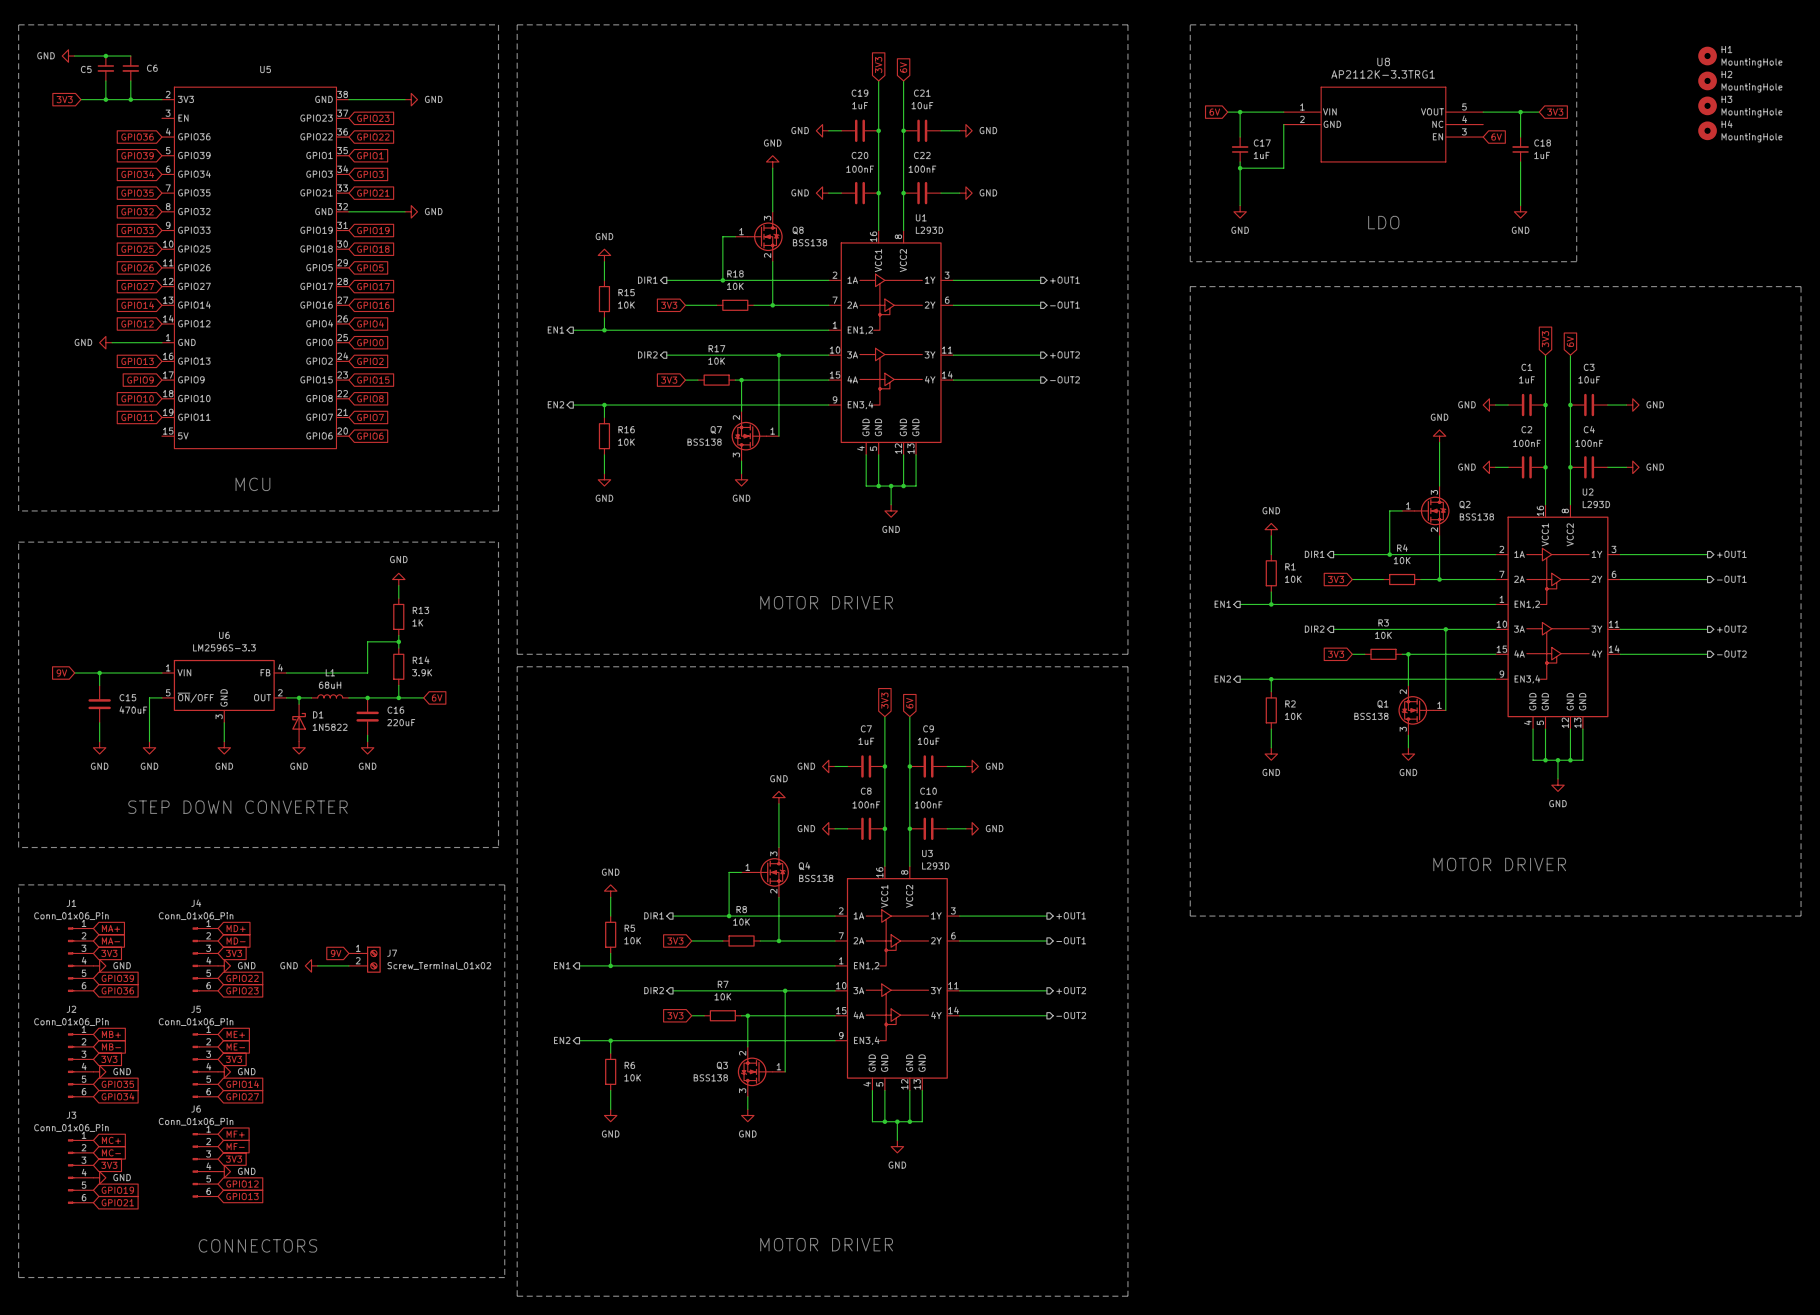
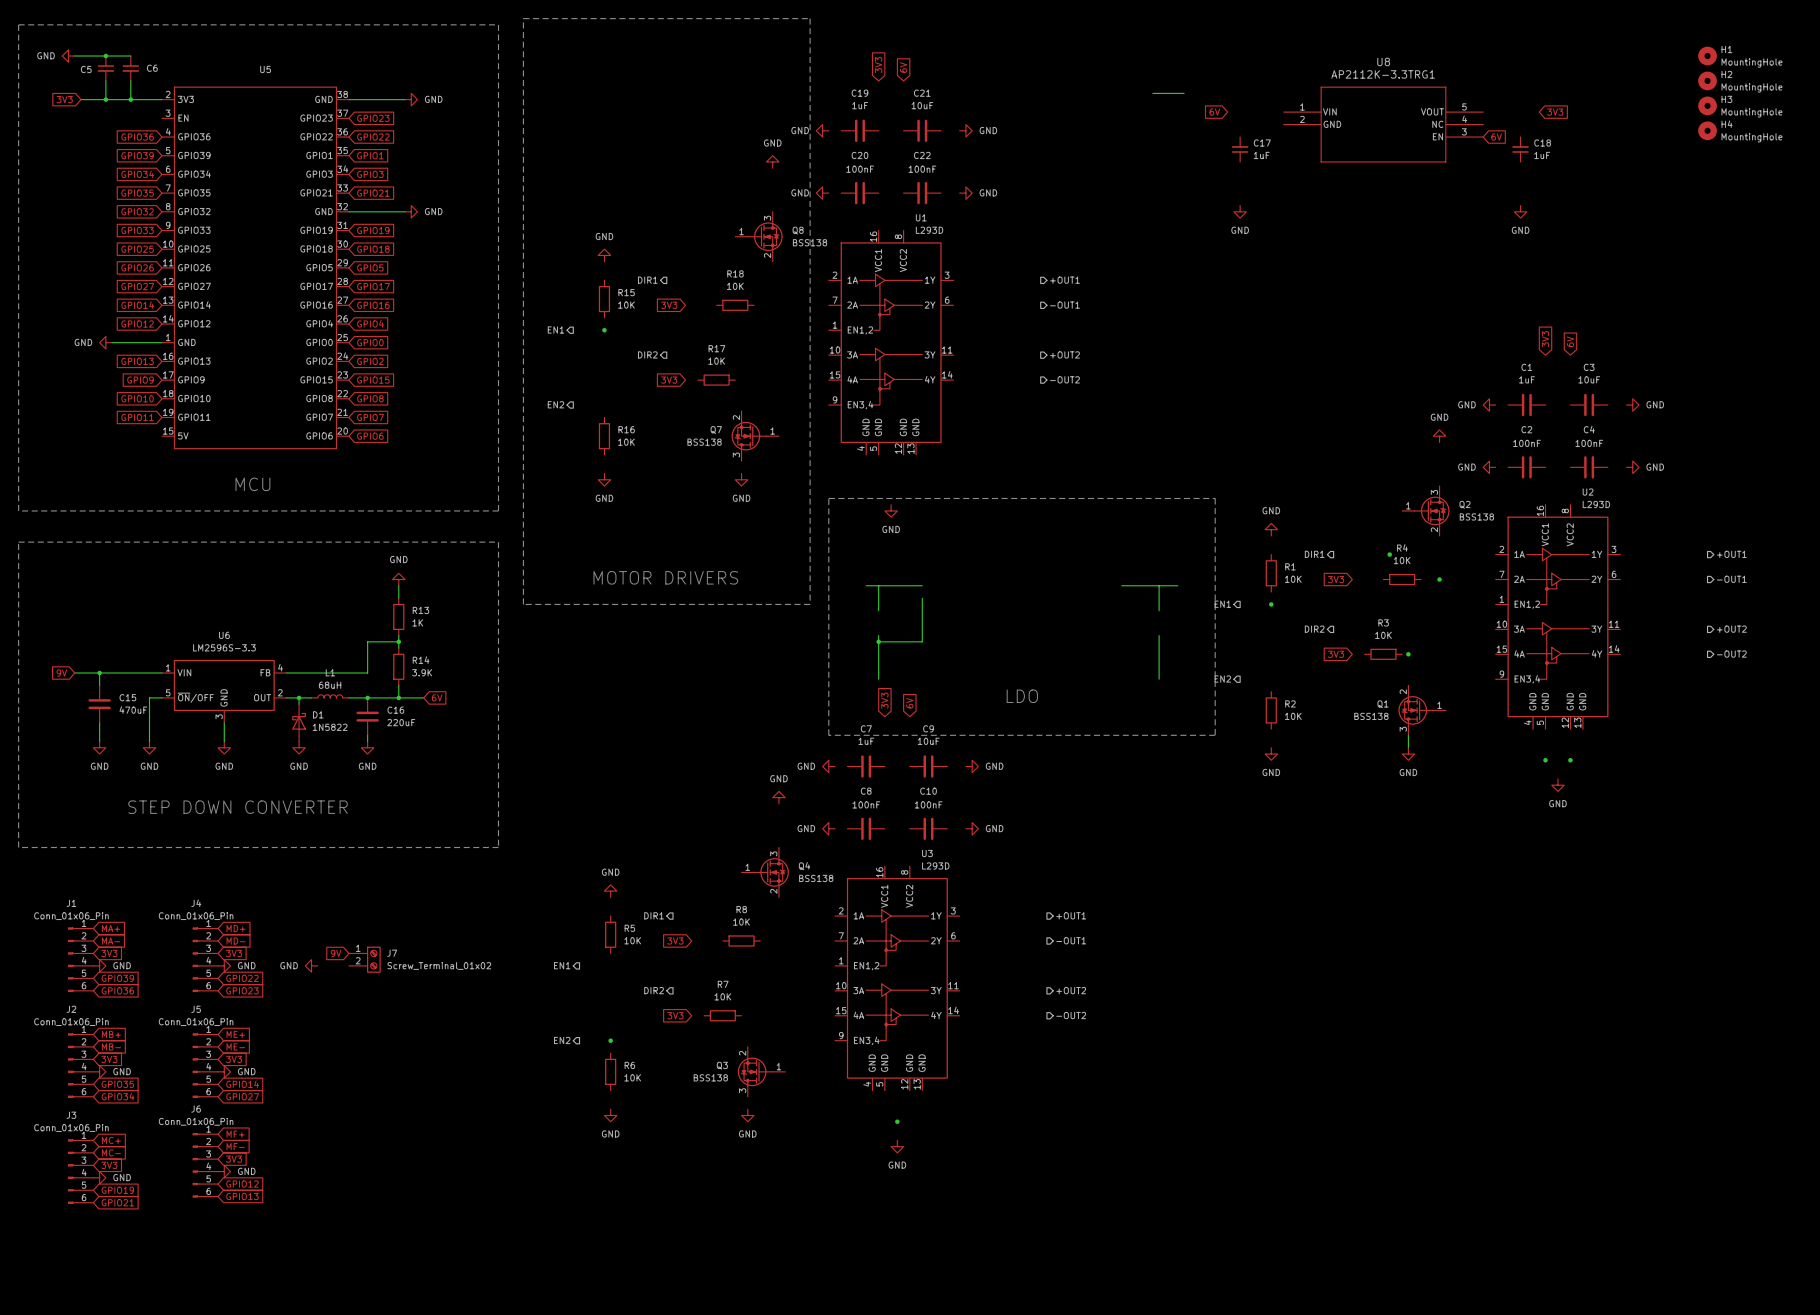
line: none -> (523, 18) (810, 18) (810, 604) (523, 604) (523, 18)
line: (517, 24) (517, 654) (1127, 654) (1127, 24) (517, 24) -> none
line: (1190, 24) (1576, 24) (1576, 261) (1190, 261) (1190, 24) -> none
wire: (878, 80) (878, 230) -> none
wire: (903, 80) (903, 230) -> none
wire: none -> (1152, 93) (1184, 93)
wire: (1227, 112) (1283, 112) -> none
wire: (1240, 112) (1240, 137) -> none
junction: (1240, 112) -> none
wire: (1483, 112) (1539, 112) -> none
wire: (1520, 112) (1520, 137) -> none
junction: (1520, 112) -> none
wire: (1283, 124) (1283, 168) (1240, 168) -> none
wire: (828, 130) (841, 130) -> none
junction: (878, 130) -> none
junction: (903, 130) -> none
wire: (940, 130) (959, 130) -> none
wire: (1240, 161) (1240, 205) -> none
wire: (1520, 161) (1520, 205) -> none
wire: (772, 168) (772, 211) -> none
junction: (1240, 168) -> none
wire: (828, 193) (841, 193) -> none
junction: (878, 193) -> none
junction: (903, 193) -> none
wire: (940, 193) (959, 193) -> none
text: LDO (1383, 222) -> none
wire: (735, 236) (722, 236) (722, 280) -> none
wire: (604, 261) (604, 280) -> none
wire: (772, 261) (772, 305) -> none
wire: (666, 280) (828, 280) -> none
junction: (722, 280) -> none
wire: (953, 280) (1040, 280) -> none
line: (1190, 286) (1190, 916) (1801, 916) (1801, 286) (1190, 286) -> none
wire: (685, 305) (716, 305) -> none
wire: (754, 305) (828, 305) -> none
junction: (772, 305) -> none
wire: (953, 305) (1040, 305) -> none
wire: (604, 317) (604, 330) -> none
wire: (573, 330) (828, 330) -> none
wire: (666, 355) (828, 355) -> none
wire: (778, 355) (778, 436) -> none
junction: (778, 355) -> none
wire: (953, 355) (1040, 355) -> none
wire: (1545, 355) (1545, 504) -> none
wire: (1570, 355) (1570, 504) -> none
wire: (685, 380) (697, 380) -> none
wire: (735, 380) (828, 380) -> none
wire: (741, 380) (741, 411) -> none
junction: (741, 380) -> none
wire: (953, 380) (1040, 380) -> none
wire: (573, 405) (828, 405) -> none
wire: (604, 405) (604, 417) -> none
junction: (604, 405) -> none
wire: (1495, 405) (1508, 405) -> none
junction: (1545, 405) -> none
junction: (1570, 405) -> none
wire: (1607, 405) (1626, 405) -> none
wire: (1439, 442) (1439, 486) -> none
wire: (604, 454) (604, 473) -> none
wire: (866, 454) (866, 486) (916, 486) (916, 454) -> none
wire: (878, 454) (878, 486) -> none
wire: (903, 454) (903, 486) -> none
wire: (741, 461) (741, 473) -> none
wire: (1495, 467) (1508, 467) -> none
junction: (1545, 467) -> none
junction: (1570, 467) -> none
wire: (1607, 467) (1626, 467) -> none
junction: (878, 486) -> none
wire: (891, 486) (891, 504) -> none
junction: (891, 486) -> none
junction: (903, 486) -> none
line: none -> (828, 498) (1215, 498) (1215, 735) (828, 735) (828, 498)
wire: (1402, 510) (1389, 510) (1389, 554) -> none
wire: (1271, 535) (1271, 554) -> none
wire: (1439, 535) (1439, 579) -> none
wire: (1333, 554) (1495, 554) -> none
wire: (1620, 554) (1707, 554) -> none
text: none -> MOTOR DRIVERS (665, 577)
wire: (1352, 579) (1383, 579) -> none
wire: (1420, 579) (1495, 579) -> none
wire: (1620, 579) (1707, 579) -> none
wire: none -> (866, 585) (922, 585)
wire: none -> (878, 585) (878, 610)
wire: none -> (1121, 585) (1177, 585)
wire: none -> (1159, 585) (1159, 610)
wire: (1271, 591) (1271, 604) -> none
wire: none -> (922, 598) (922, 641) (878, 641)
text: MOTOR DRIVER (826, 602) -> none
wire: (1240, 604) (1495, 604) -> none
wire: (1333, 629) (1495, 629) -> none
wire: (1445, 629) (1445, 710) -> none
junction: (1445, 629) -> none
wire: (1620, 629) (1707, 629) -> none
wire: none -> (878, 635) (878, 679)
wire: none -> (1159, 635) (1159, 679)
junction: none -> (878, 641)
wire: (1352, 654) (1364, 654) -> none
wire: (1402, 654) (1495, 654) -> none
wire: (1408, 654) (1408, 685) -> none
wire: (1620, 654) (1707, 654) -> none
line: (517, 666) (1127, 666) (1127, 1296) (517, 1296) (517, 666) -> none
wire: (1240, 679) (1495, 679) -> none
wire: (1271, 679) (1271, 691) -> none
junction: (1271, 679) -> none
text: none -> LDO (1022, 696)
wire: (884, 716) (884, 866) -> none
wire: (909, 716) (909, 866) -> none
wire: (1271, 729) (1271, 747) -> none
wire: (1533, 729) (1533, 760) (1582, 760) (1582, 729) -> none
wire: (1545, 729) (1545, 760) -> none
wire: (1570, 729) (1570, 760) -> none
wire: (1557, 760) (1557, 778) -> none
junction: (1557, 760) -> none
wire: (835, 766) (847, 766) -> none
junction: (884, 766) -> none
junction: (909, 766) -> none
wire: (947, 766) (965, 766) -> none
wire: (778, 803) (778, 847) -> none
wire: (835, 828) (847, 828) -> none
junction: (884, 828) -> none
junction: (909, 828) -> none
wire: (947, 828) (965, 828) -> none
text: MOTOR DRIVER (1499, 864) -> none
wire: (741, 872) (729, 872) (729, 916) -> none
line: (18, 884) (504, 884) (504, 1277) (18, 1277) (18, 884) -> none
wire: (610, 897) (610, 916) -> none
wire: (778, 897) (778, 940) -> none
wire: (673, 916) (835, 916) -> none
junction: (729, 916) -> none
wire: (959, 916) (1046, 916) -> none
wire: (691, 940) (722, 940) -> none
wire: (760, 940) (835, 940) -> none
junction: (778, 940) -> none
wire: (959, 940) (1046, 940) -> none
wire: (610, 953) (610, 965) -> none
wire: (317, 965) (348, 965) -> none
wire: (579, 965) (835, 965) -> none
junction: (610, 965) -> none
wire: (673, 990) (835, 990) -> none
wire: (785, 990) (785, 1071) -> none
junction: (785, 990) -> none
wire: (959, 990) (1046, 990) -> none
wire: (691, 1015) (704, 1015) -> none
wire: (741, 1015) (835, 1015) -> none
wire: (747, 1015) (747, 1046) -> none
junction: (747, 1015) -> none
wire: (959, 1015) (1046, 1015) -> none
wire: (579, 1040) (835, 1040) -> none
wire: (610, 1040) (610, 1053) -> none
wire: (610, 1090) (610, 1109) -> none
wire: (872, 1090) (872, 1121) (922, 1121) (922, 1090) -> none
wire: (884, 1090) (884, 1121) -> none
wire: (909, 1090) (909, 1121) -> none
wire: (747, 1096) (747, 1109) -> none
junction: (884, 1121) -> none
wire: (897, 1121) (897, 1140) -> none
junction: (909, 1121) -> none
text: MOTOR DRIVER (826, 1244) -> none
text: CONNECTORS (257, 1245) -> none

